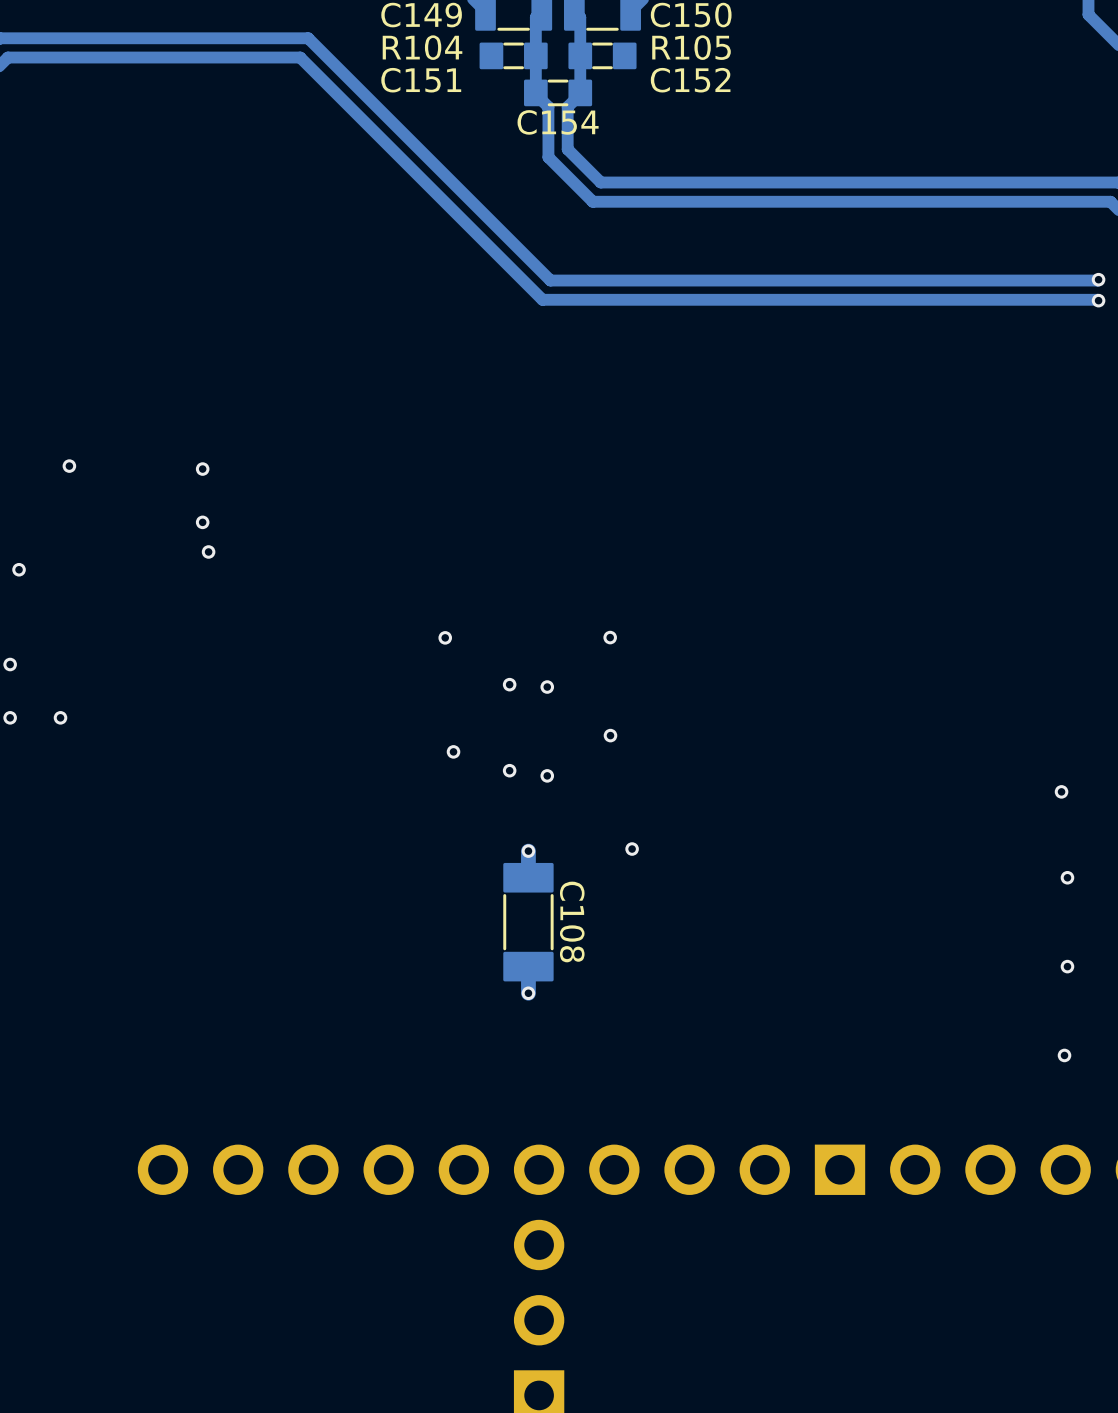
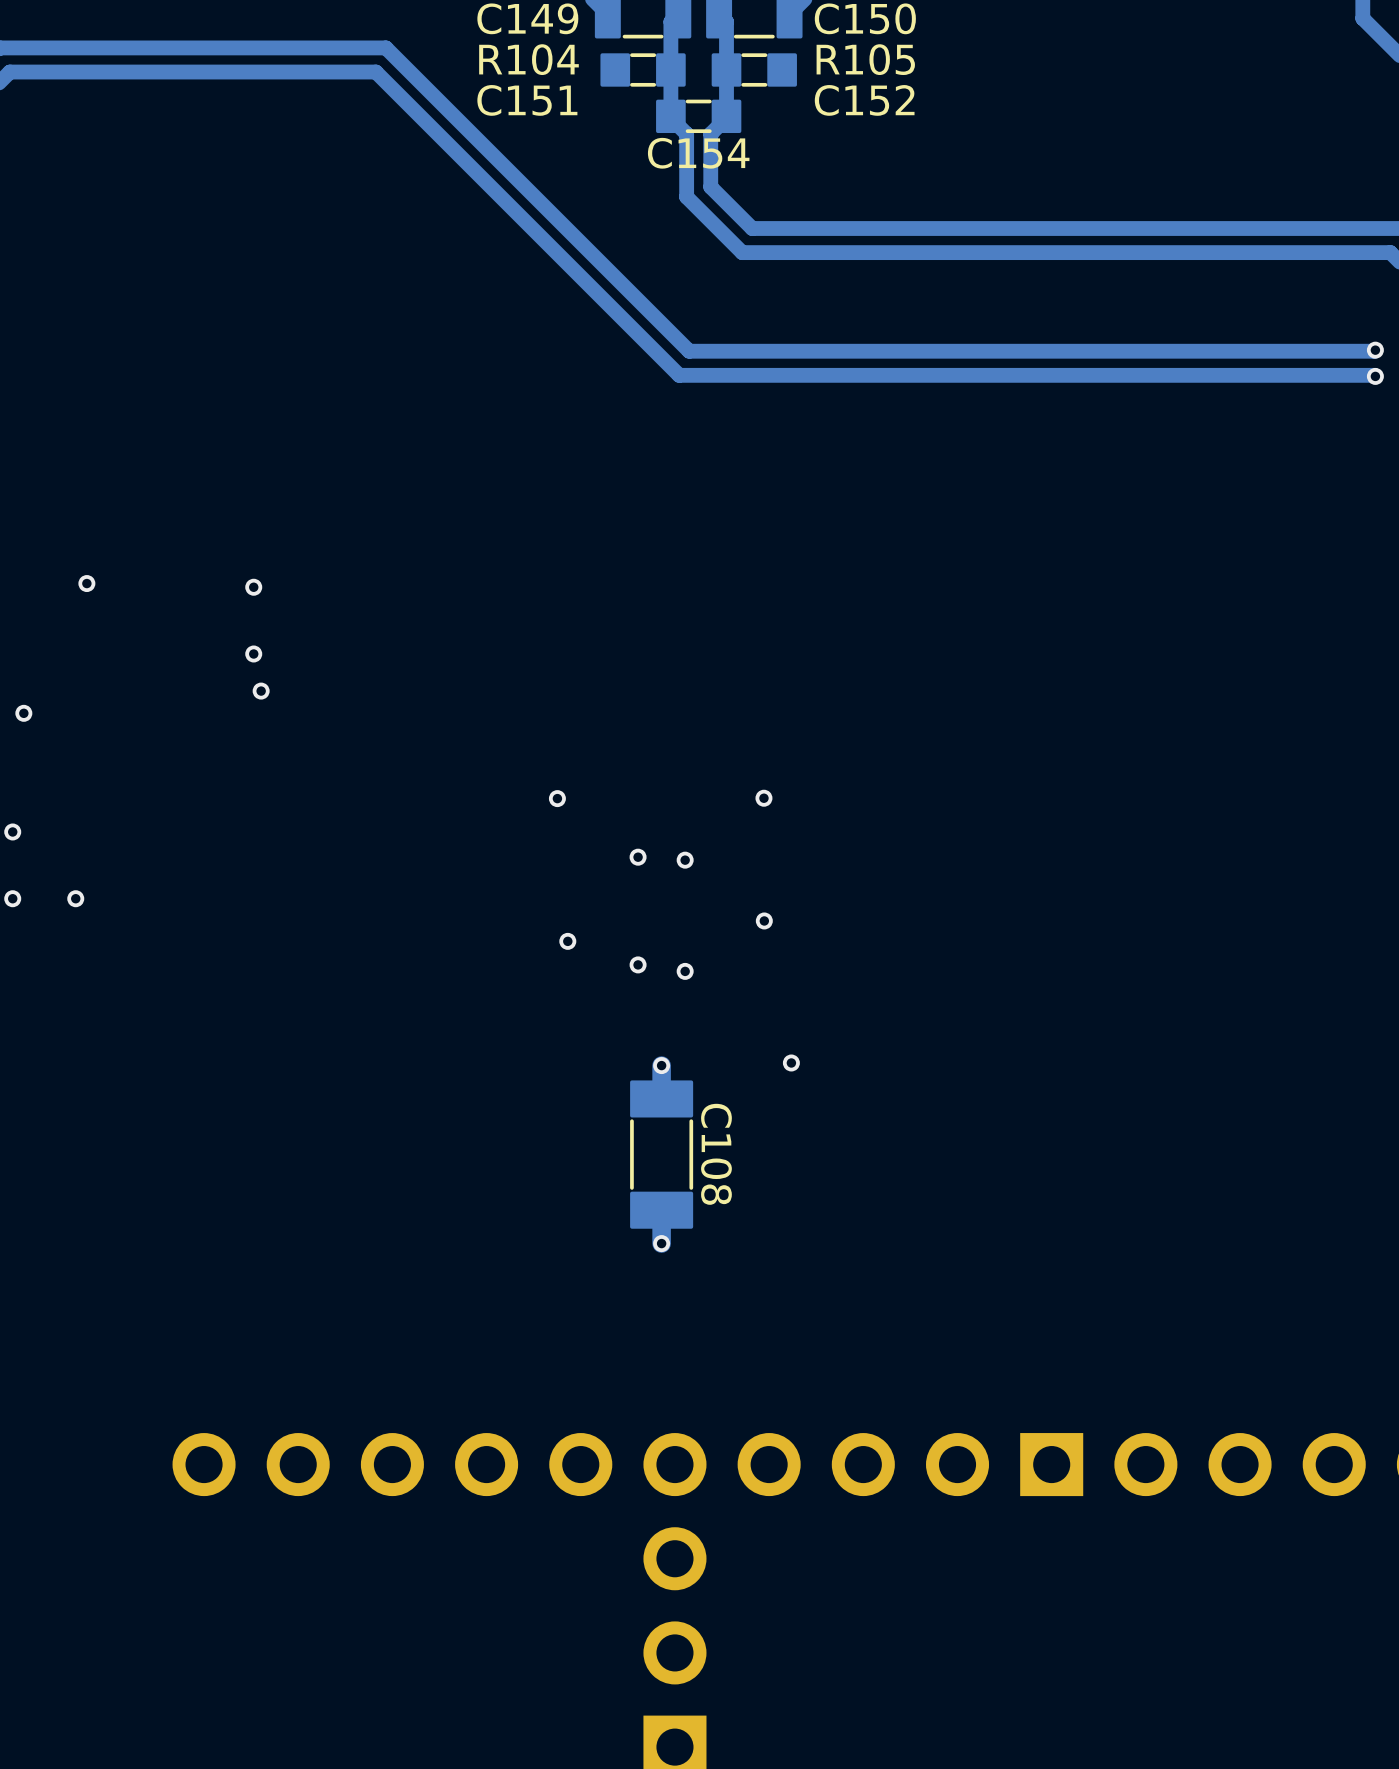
via: (1061, 791) -> none
via: (1067, 877) -> none
via: (1067, 966) -> none
via: (1064, 1055) -> none

